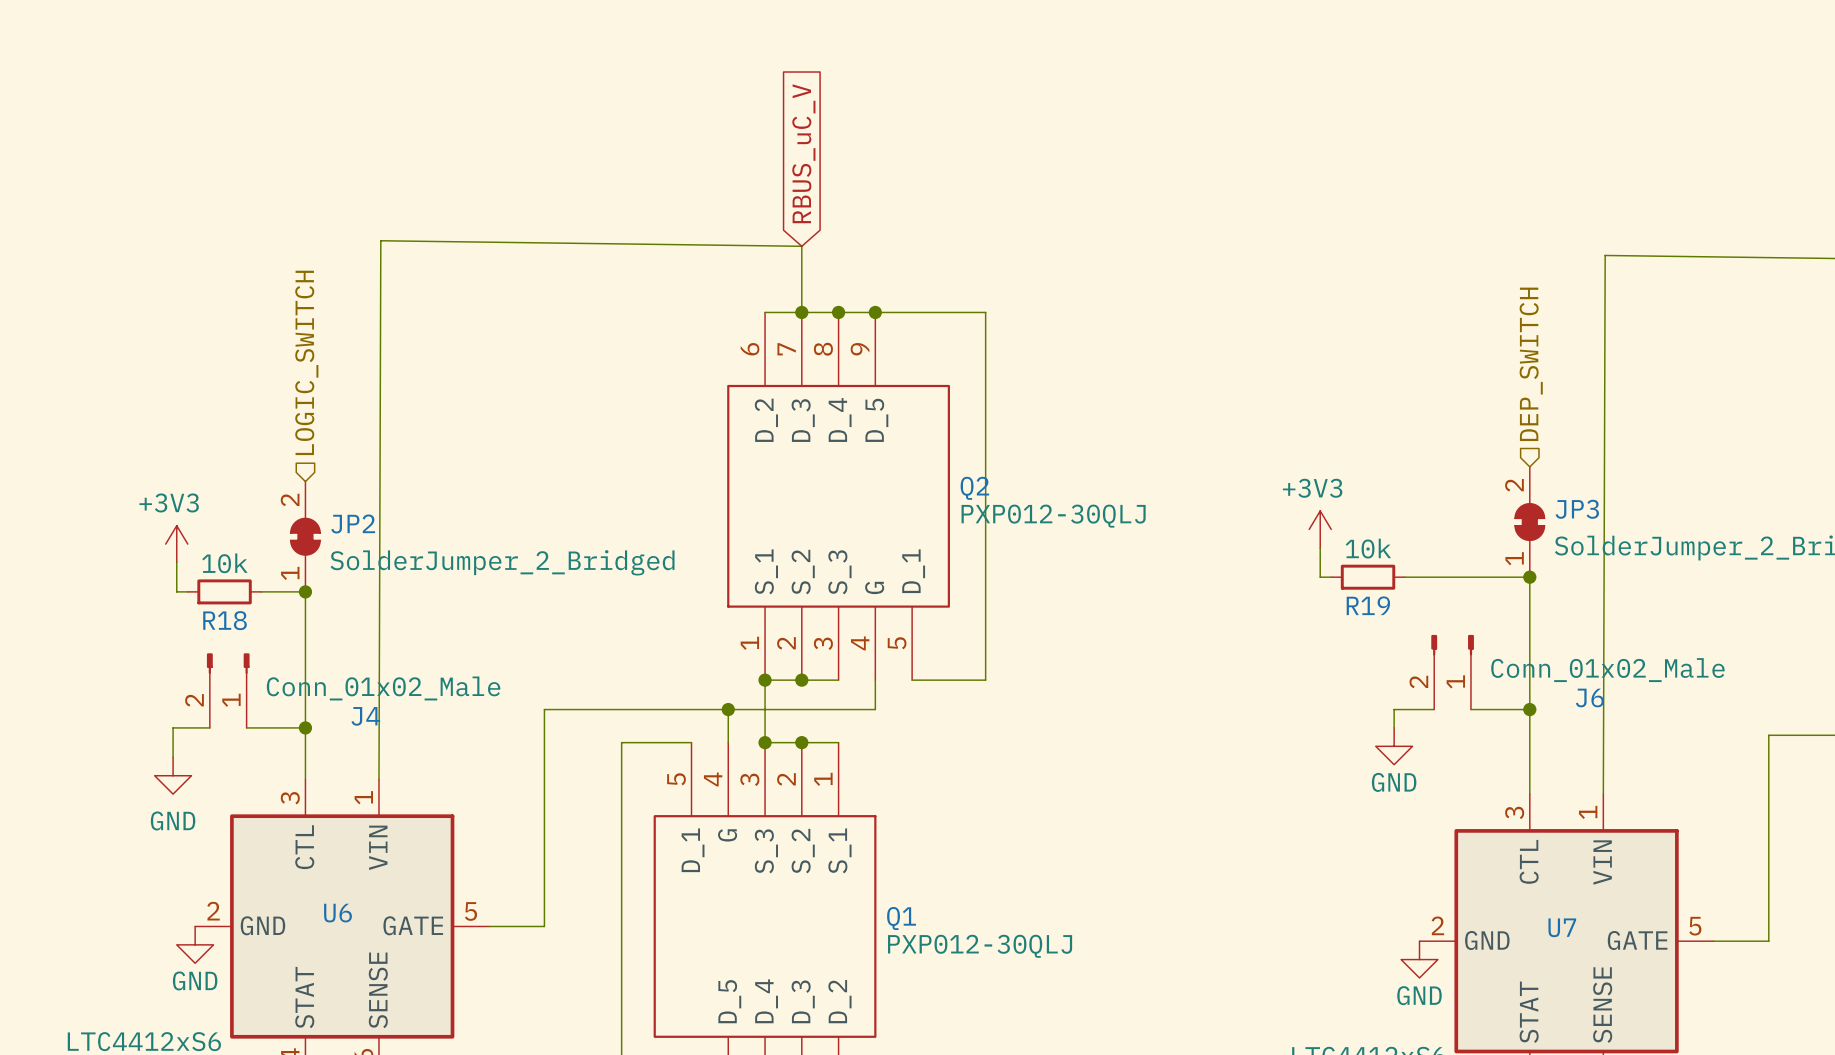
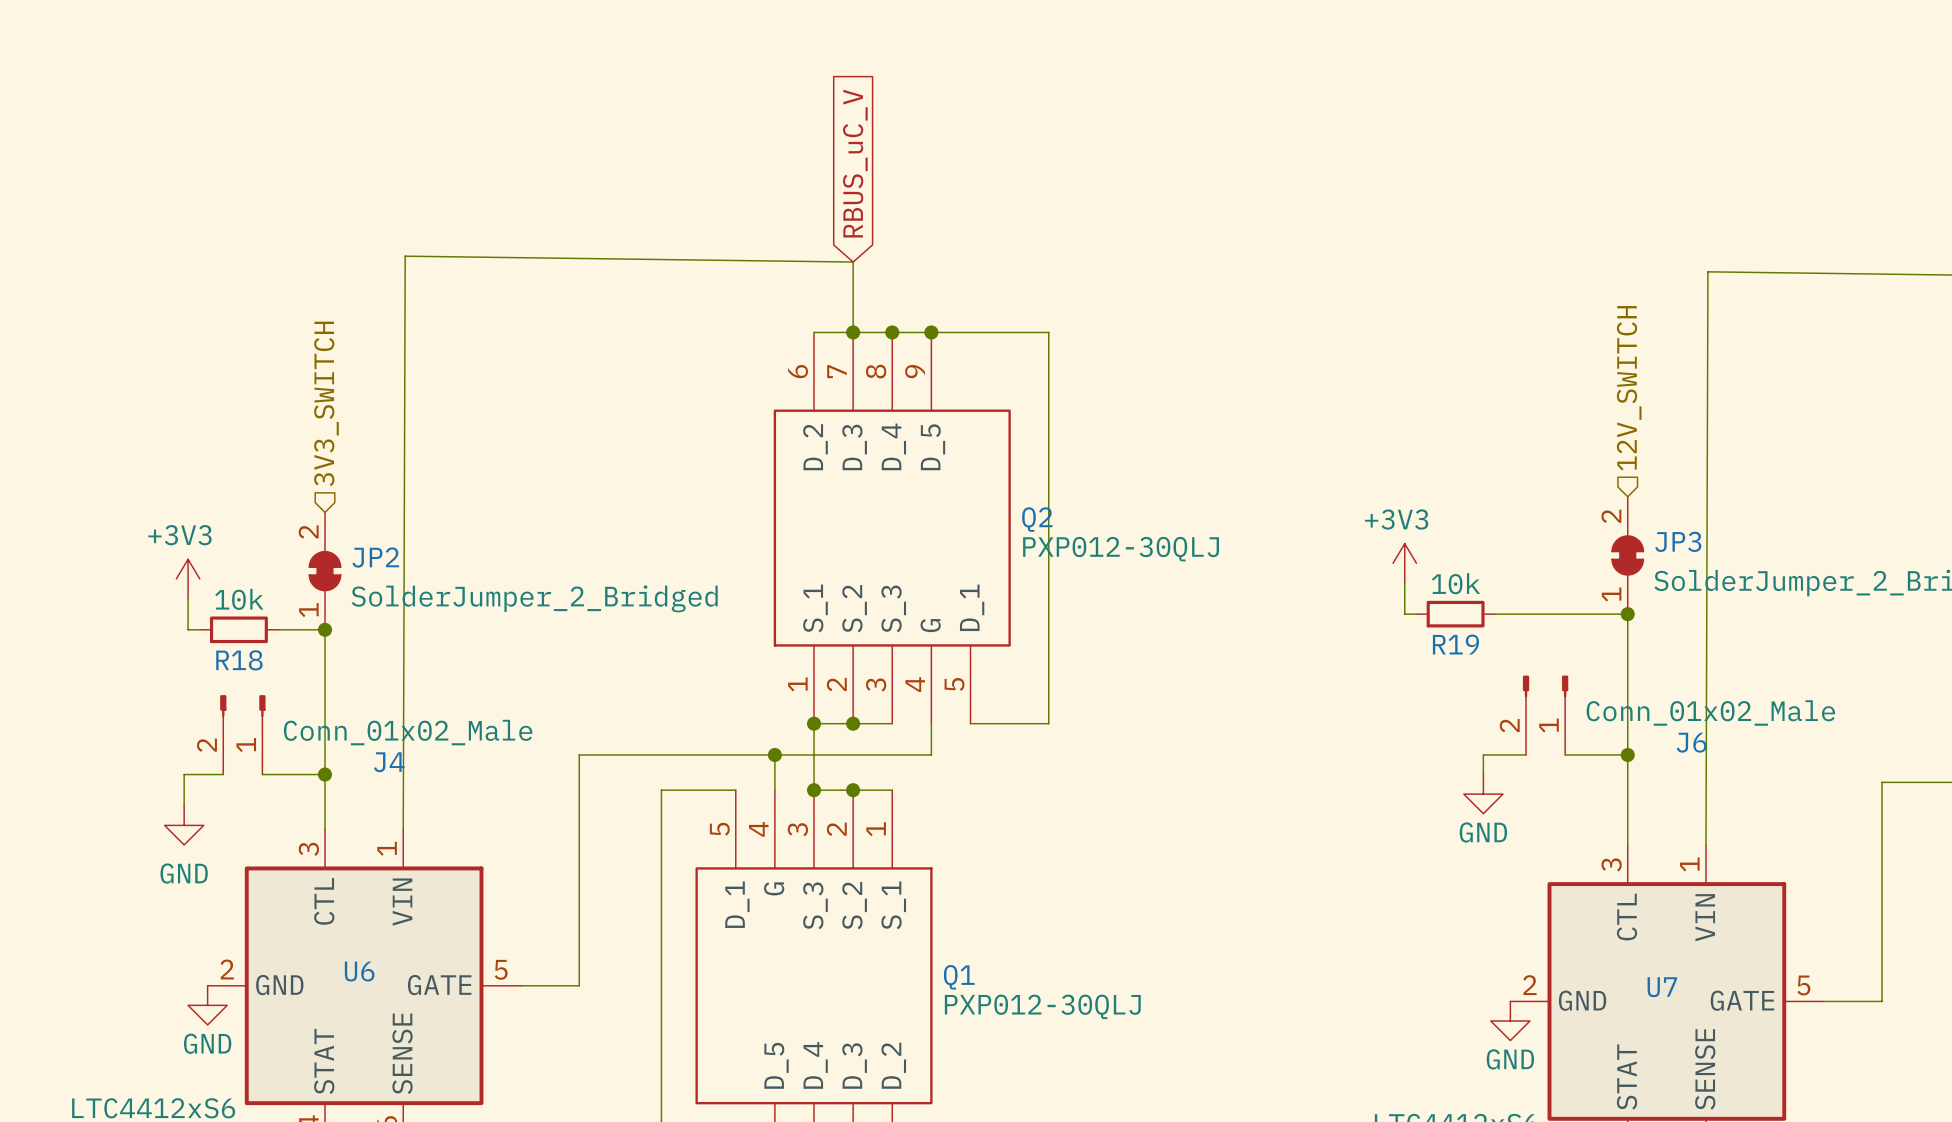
hierarchical label: LOGIC_SWITCH (306, 362) -> 3V3_SWITCH (326, 403)
hierarchical label: DEP_SWITCH (1531, 364) -> 12V_SWITCH (1629, 388)

